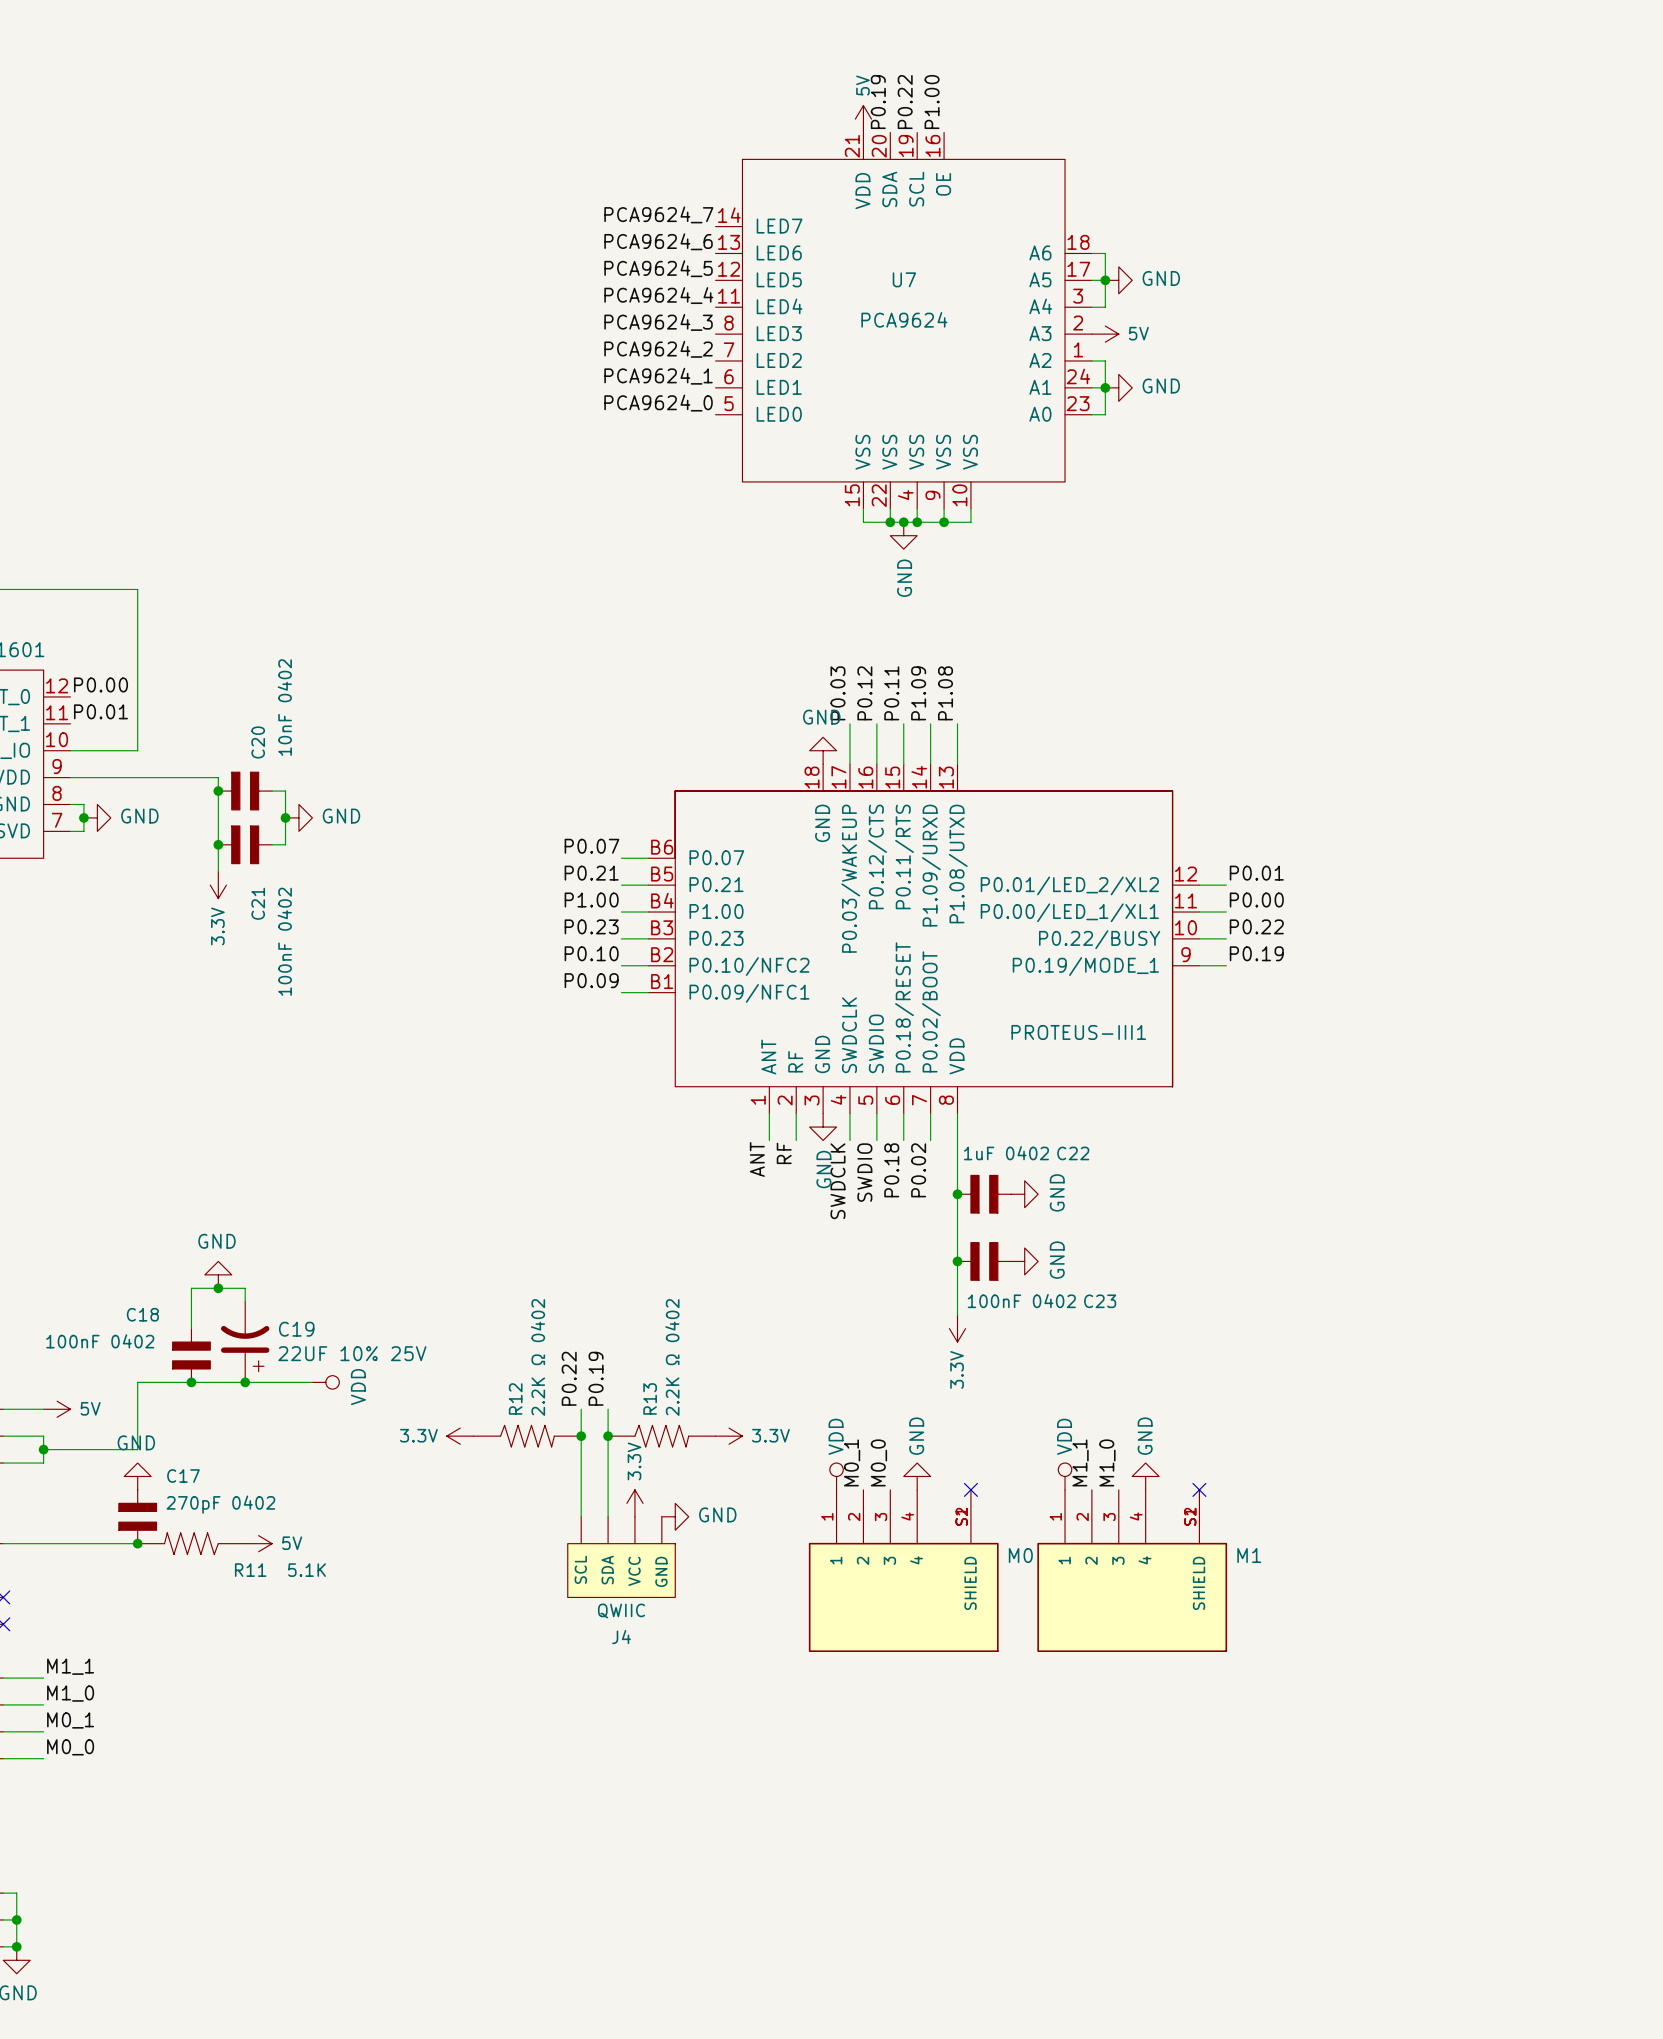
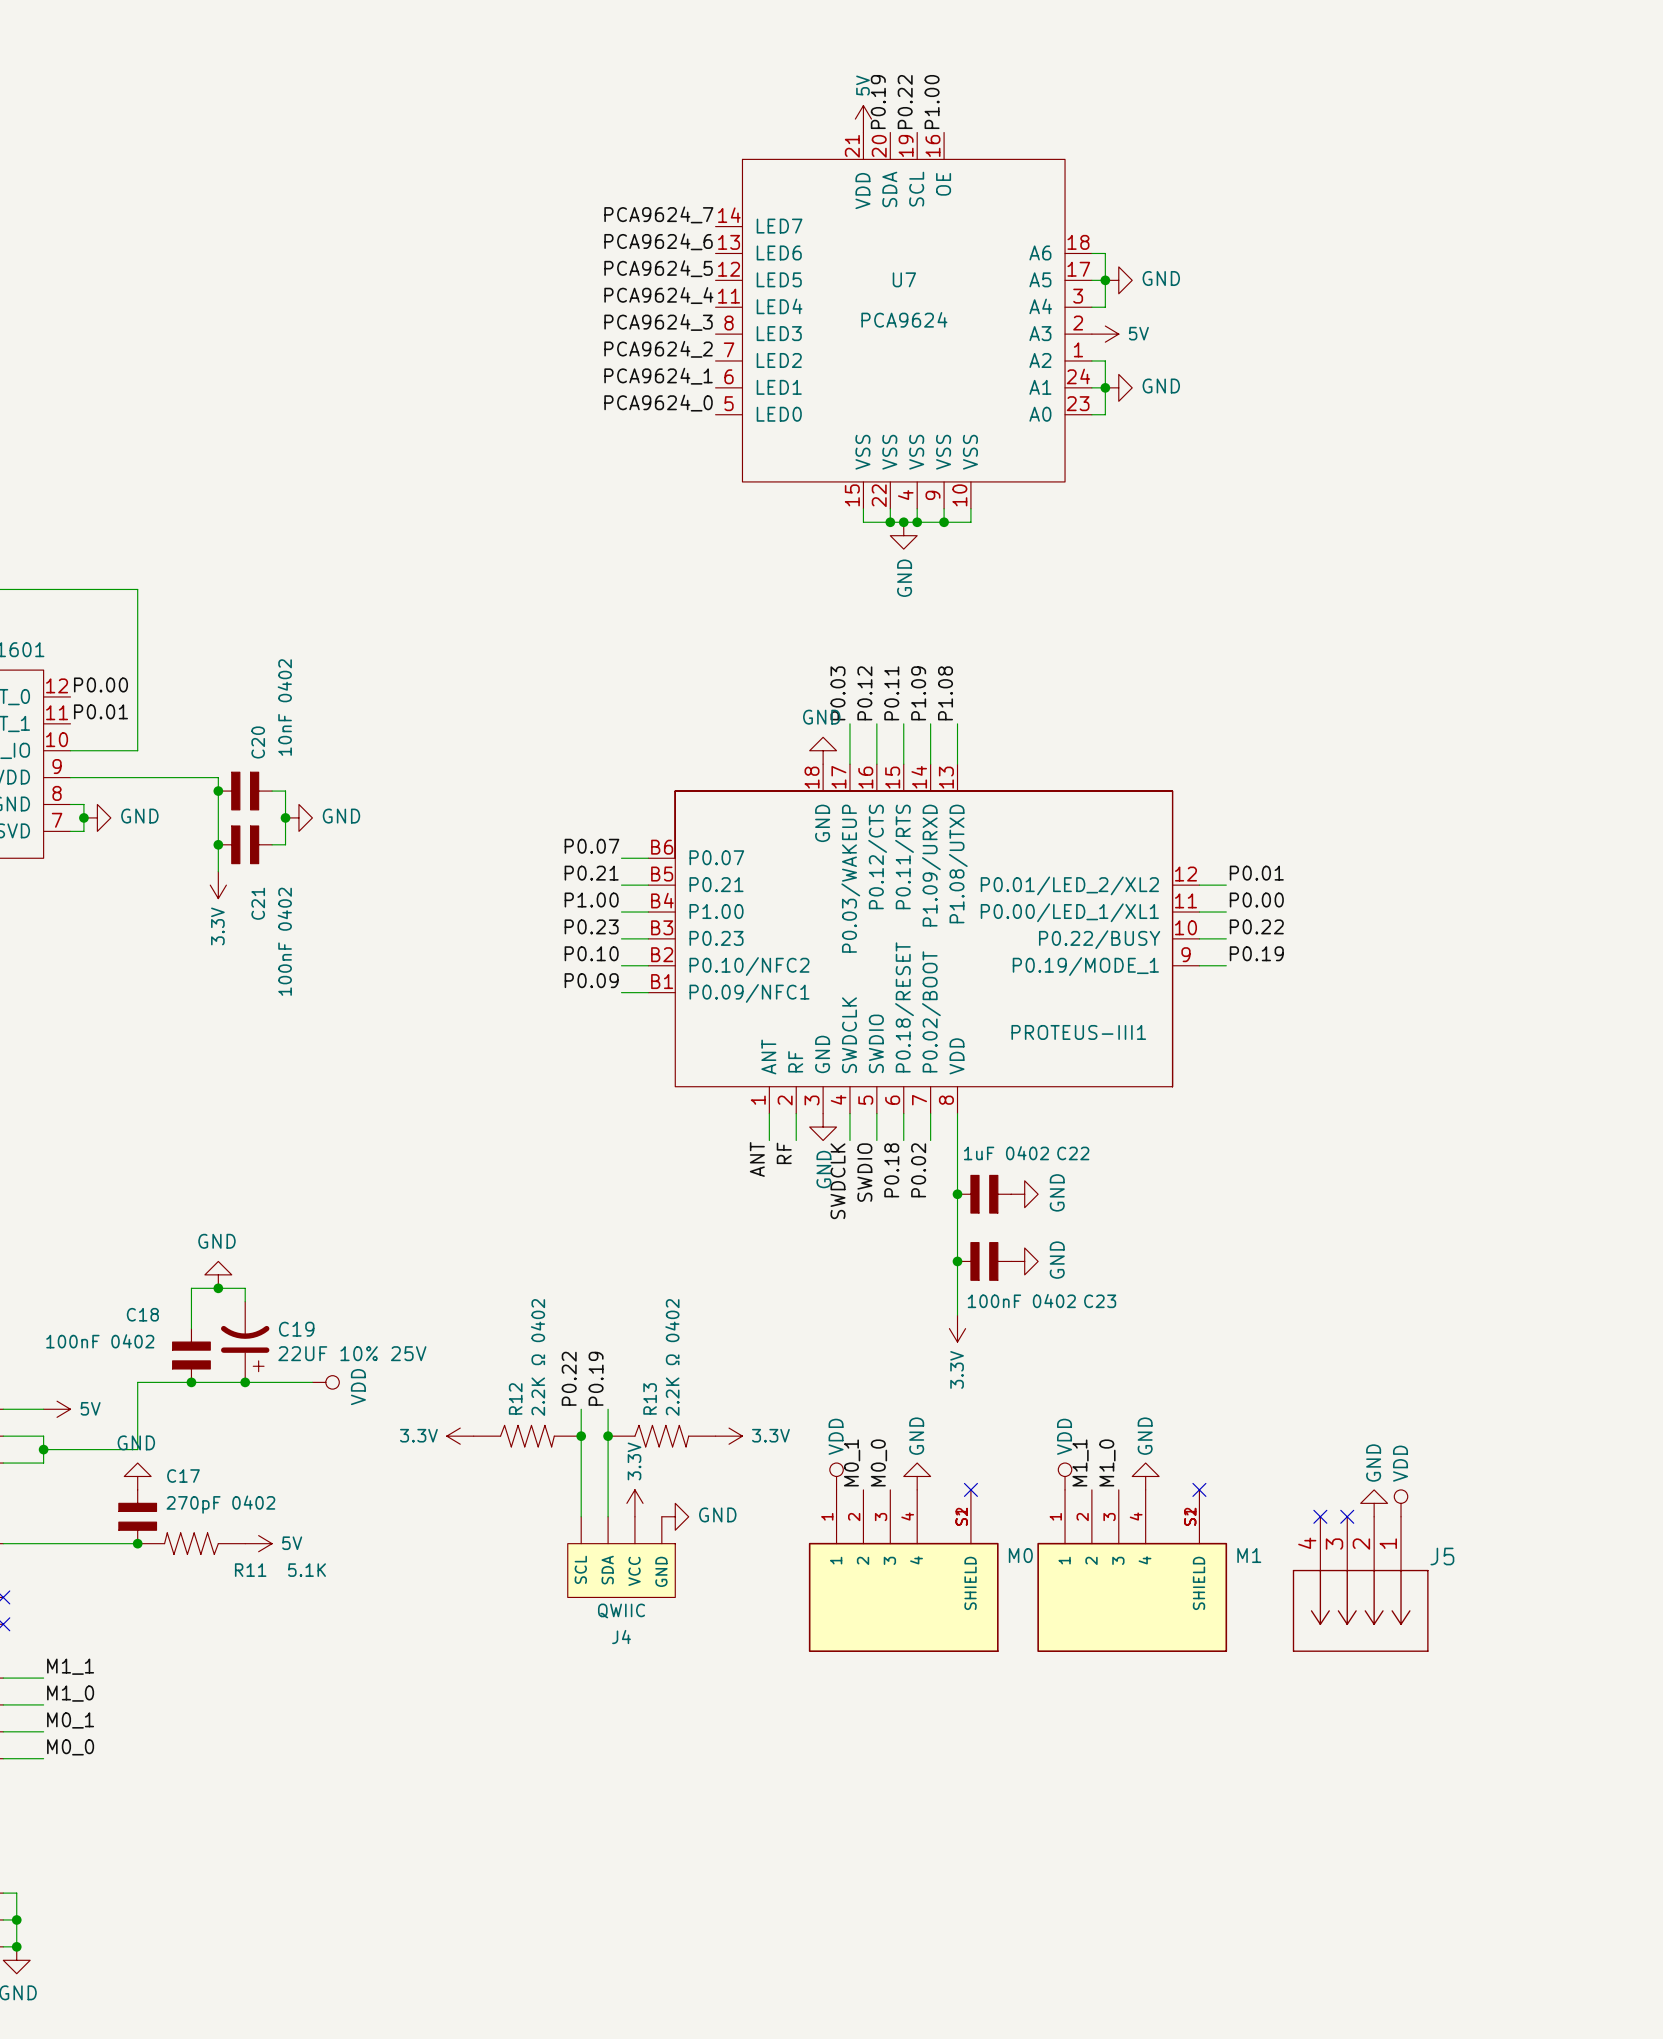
power symbol: none -> GND (1374, 1503)
power symbol: none -> VDD (1401, 1503)
no-connect mark: none -> (1320, 1516)
no-connect mark: none -> (1347, 1516)
J5: none -> (1360, 1584)

